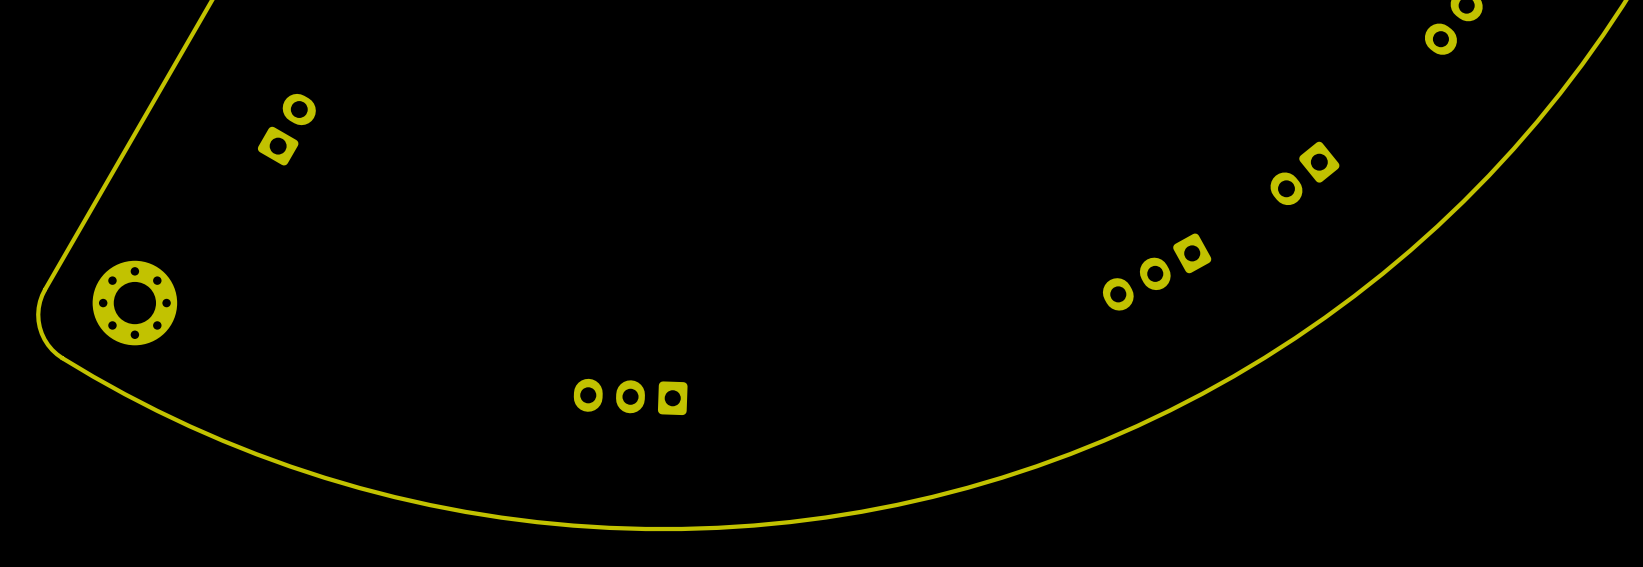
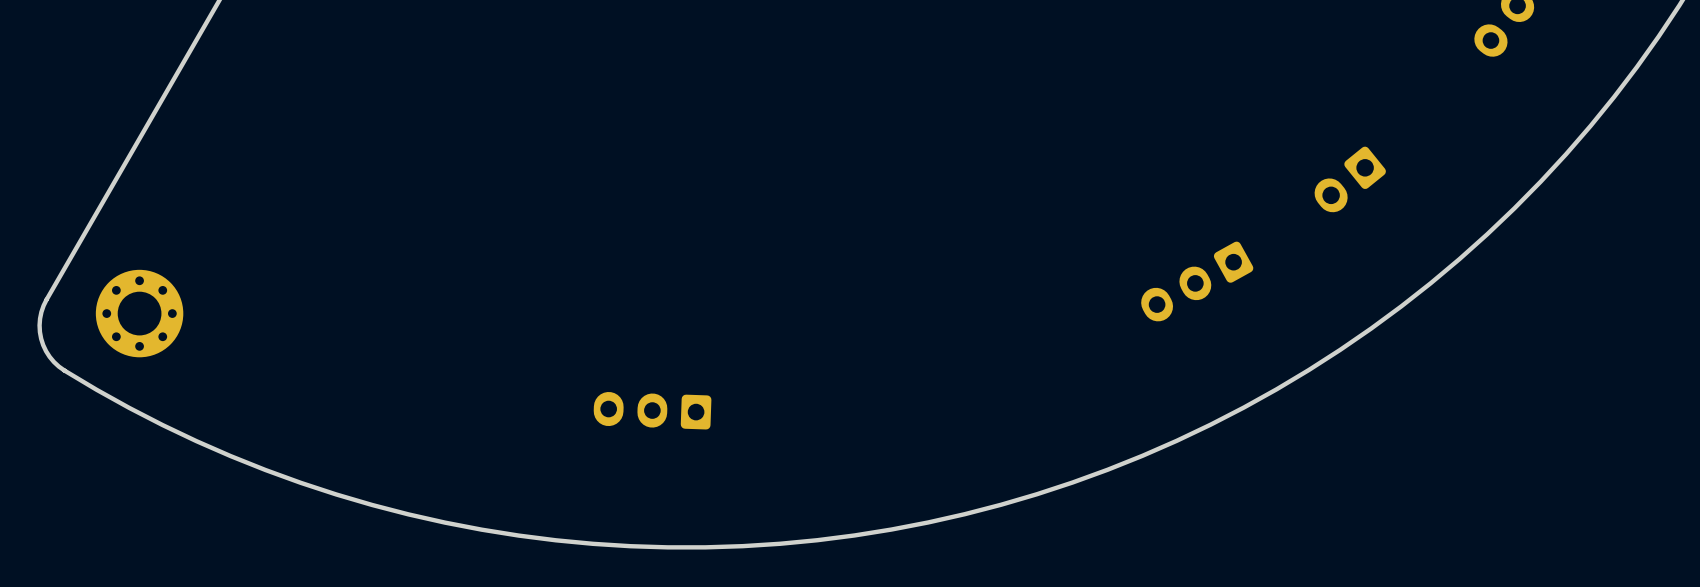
part: (286, 129) -> none

